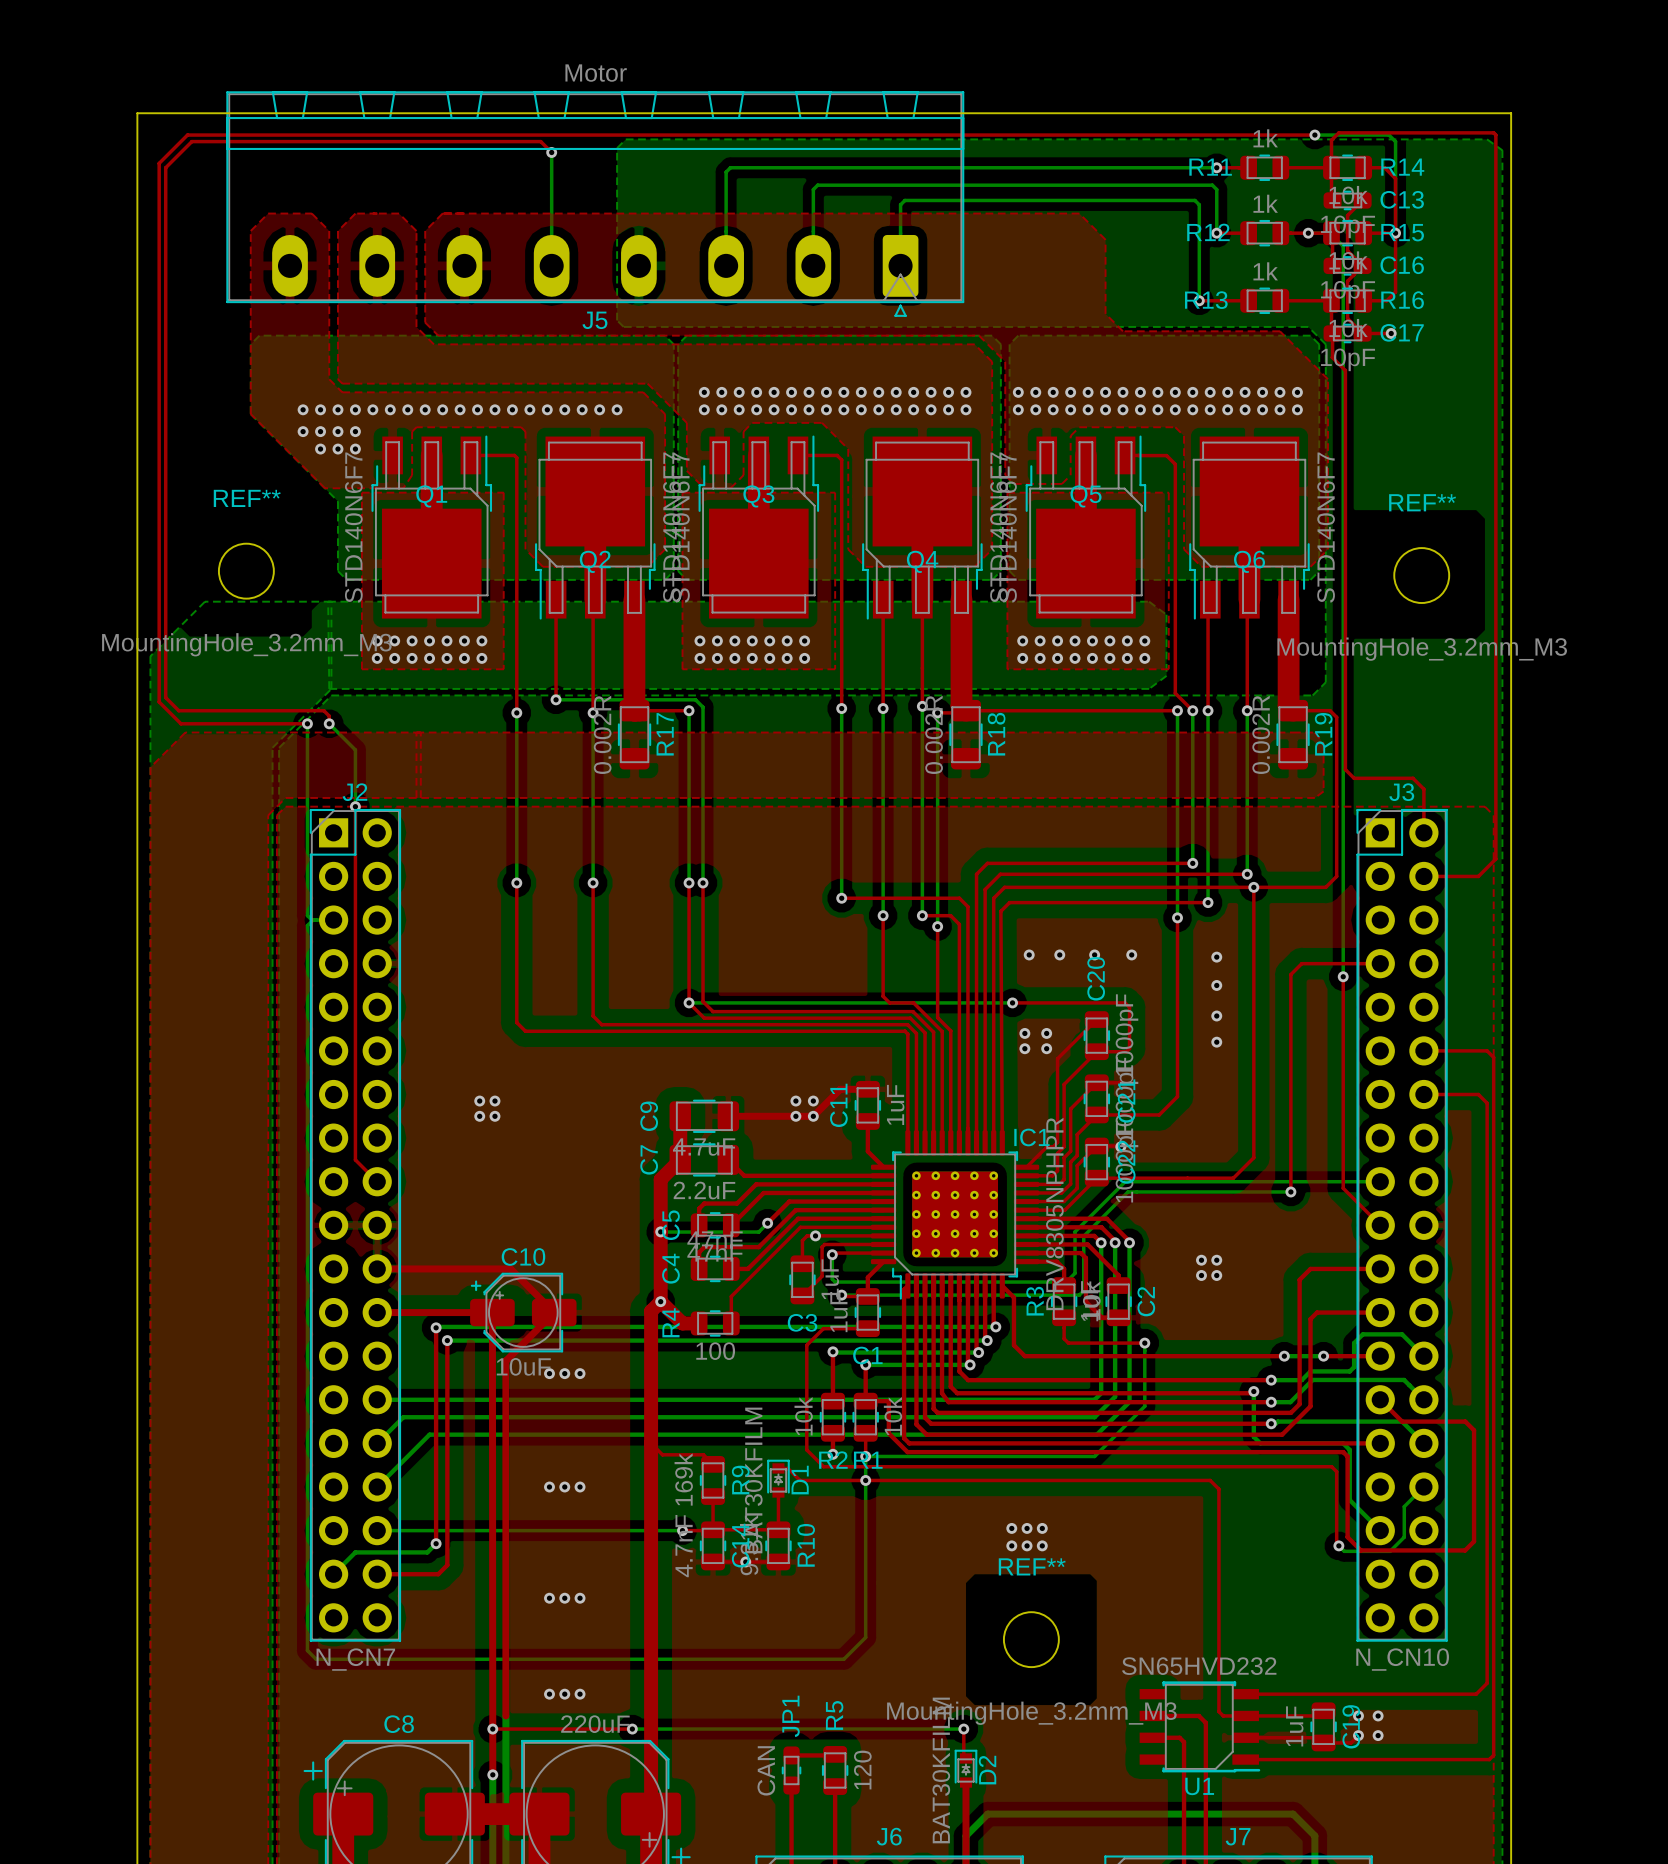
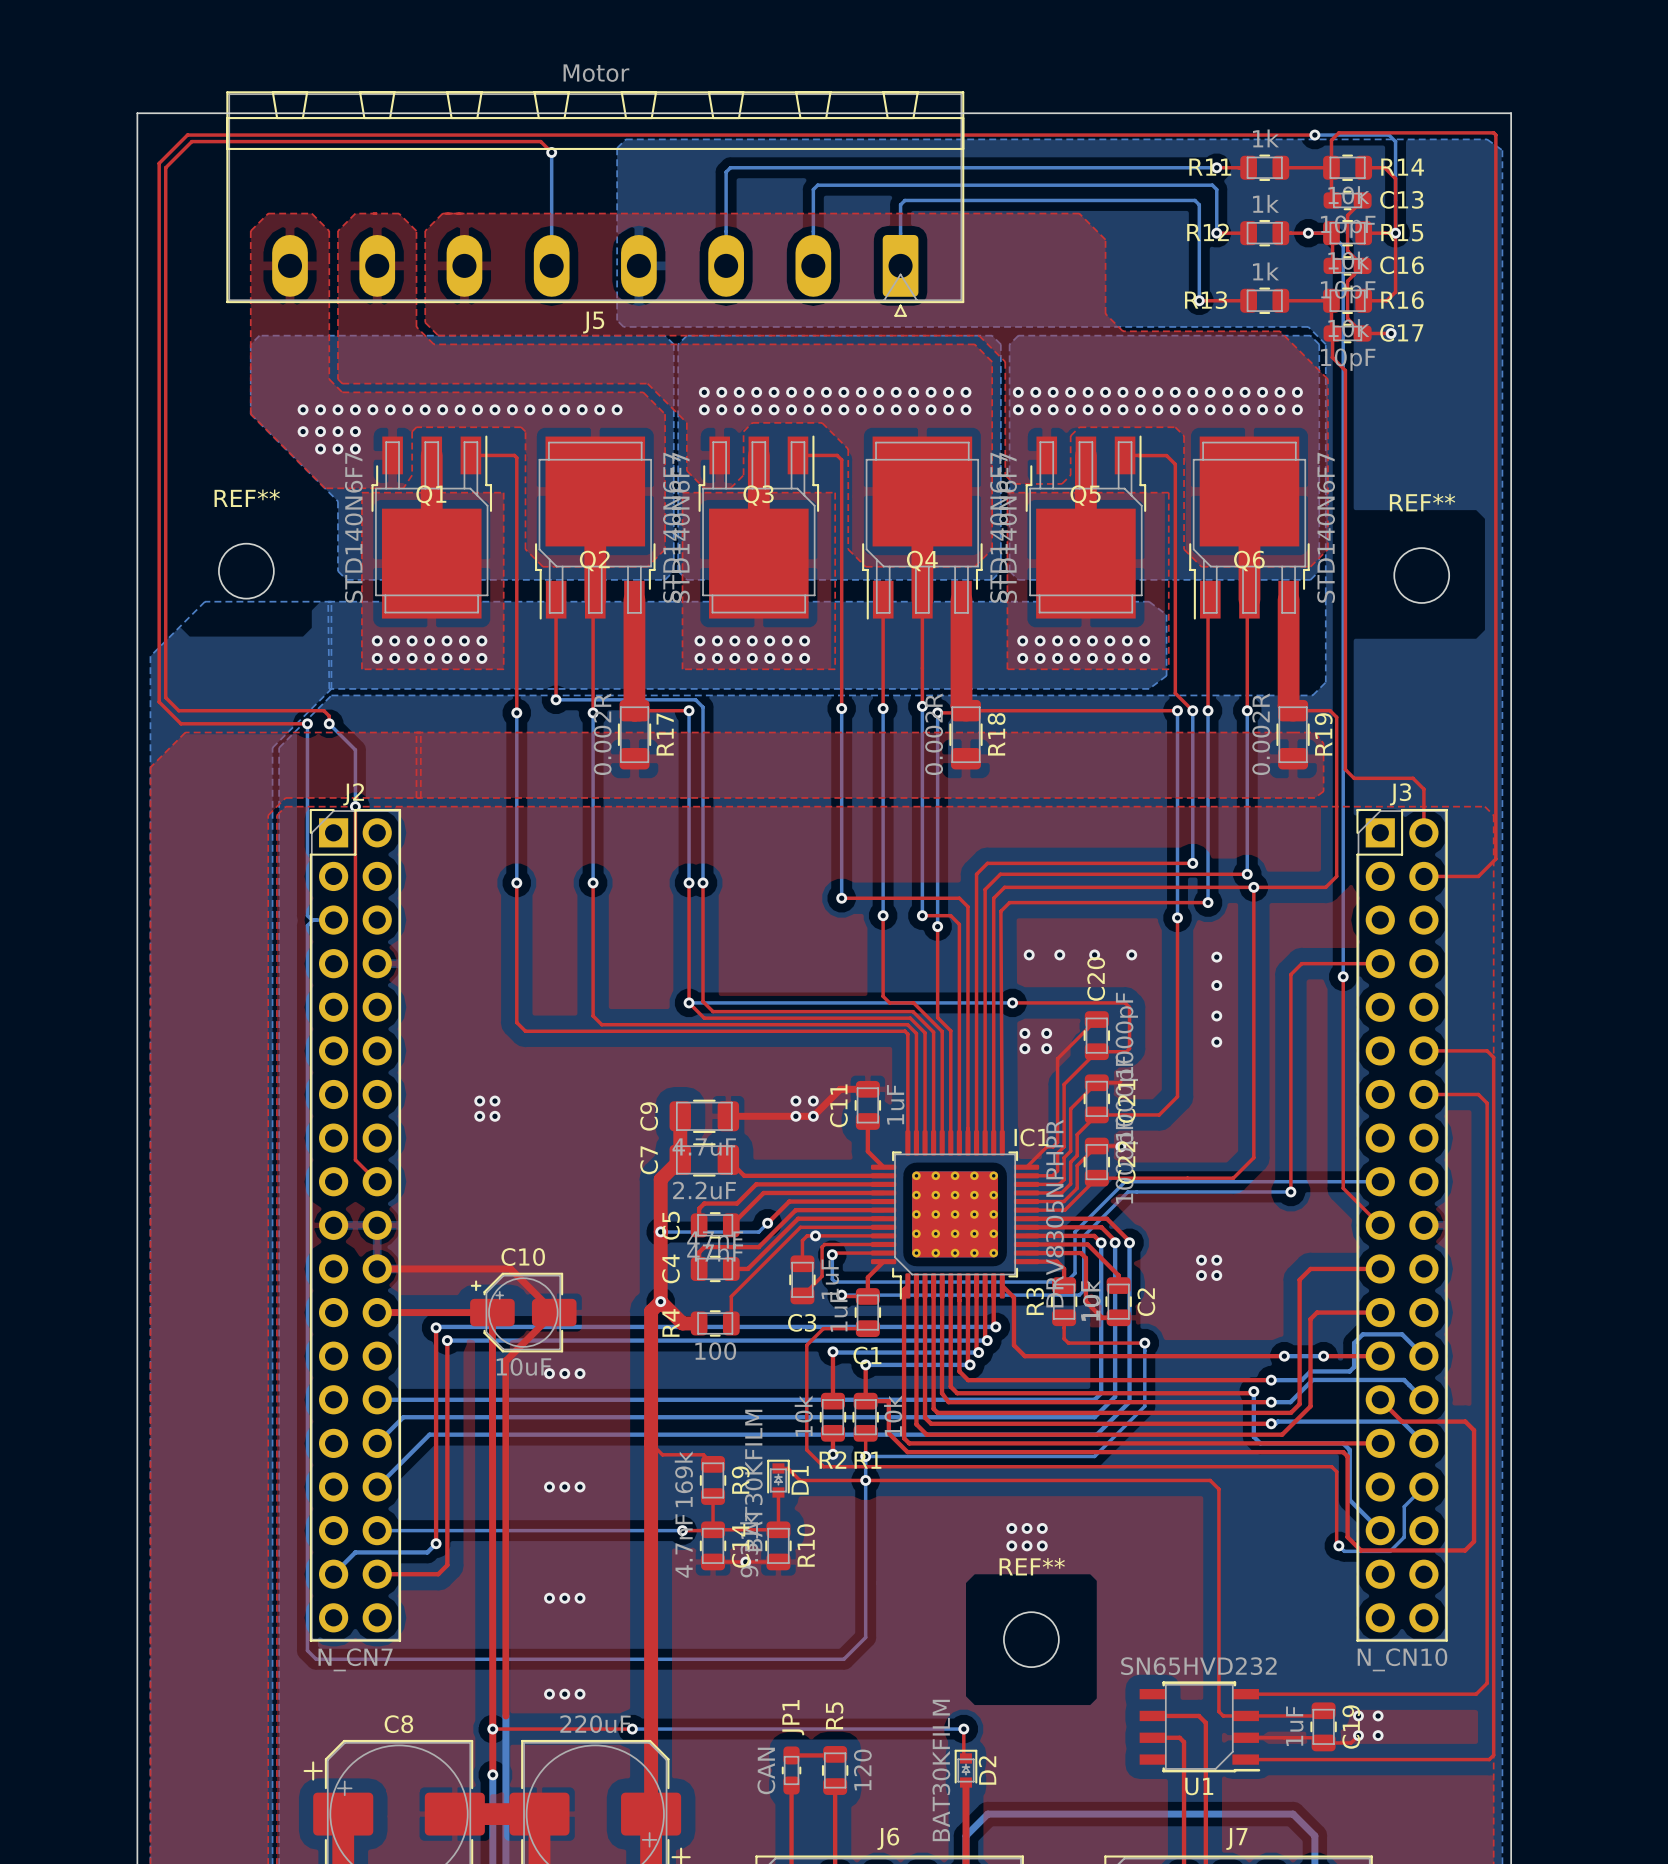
REF** value: MountingHole_3.2mm_M3 (246, 644) -> none
REF** value: MountingHole_3.2mm_M3 (1422, 649) -> none
REF** value: MountingHole_3.2mm_M3 (1031, 1713) -> none

